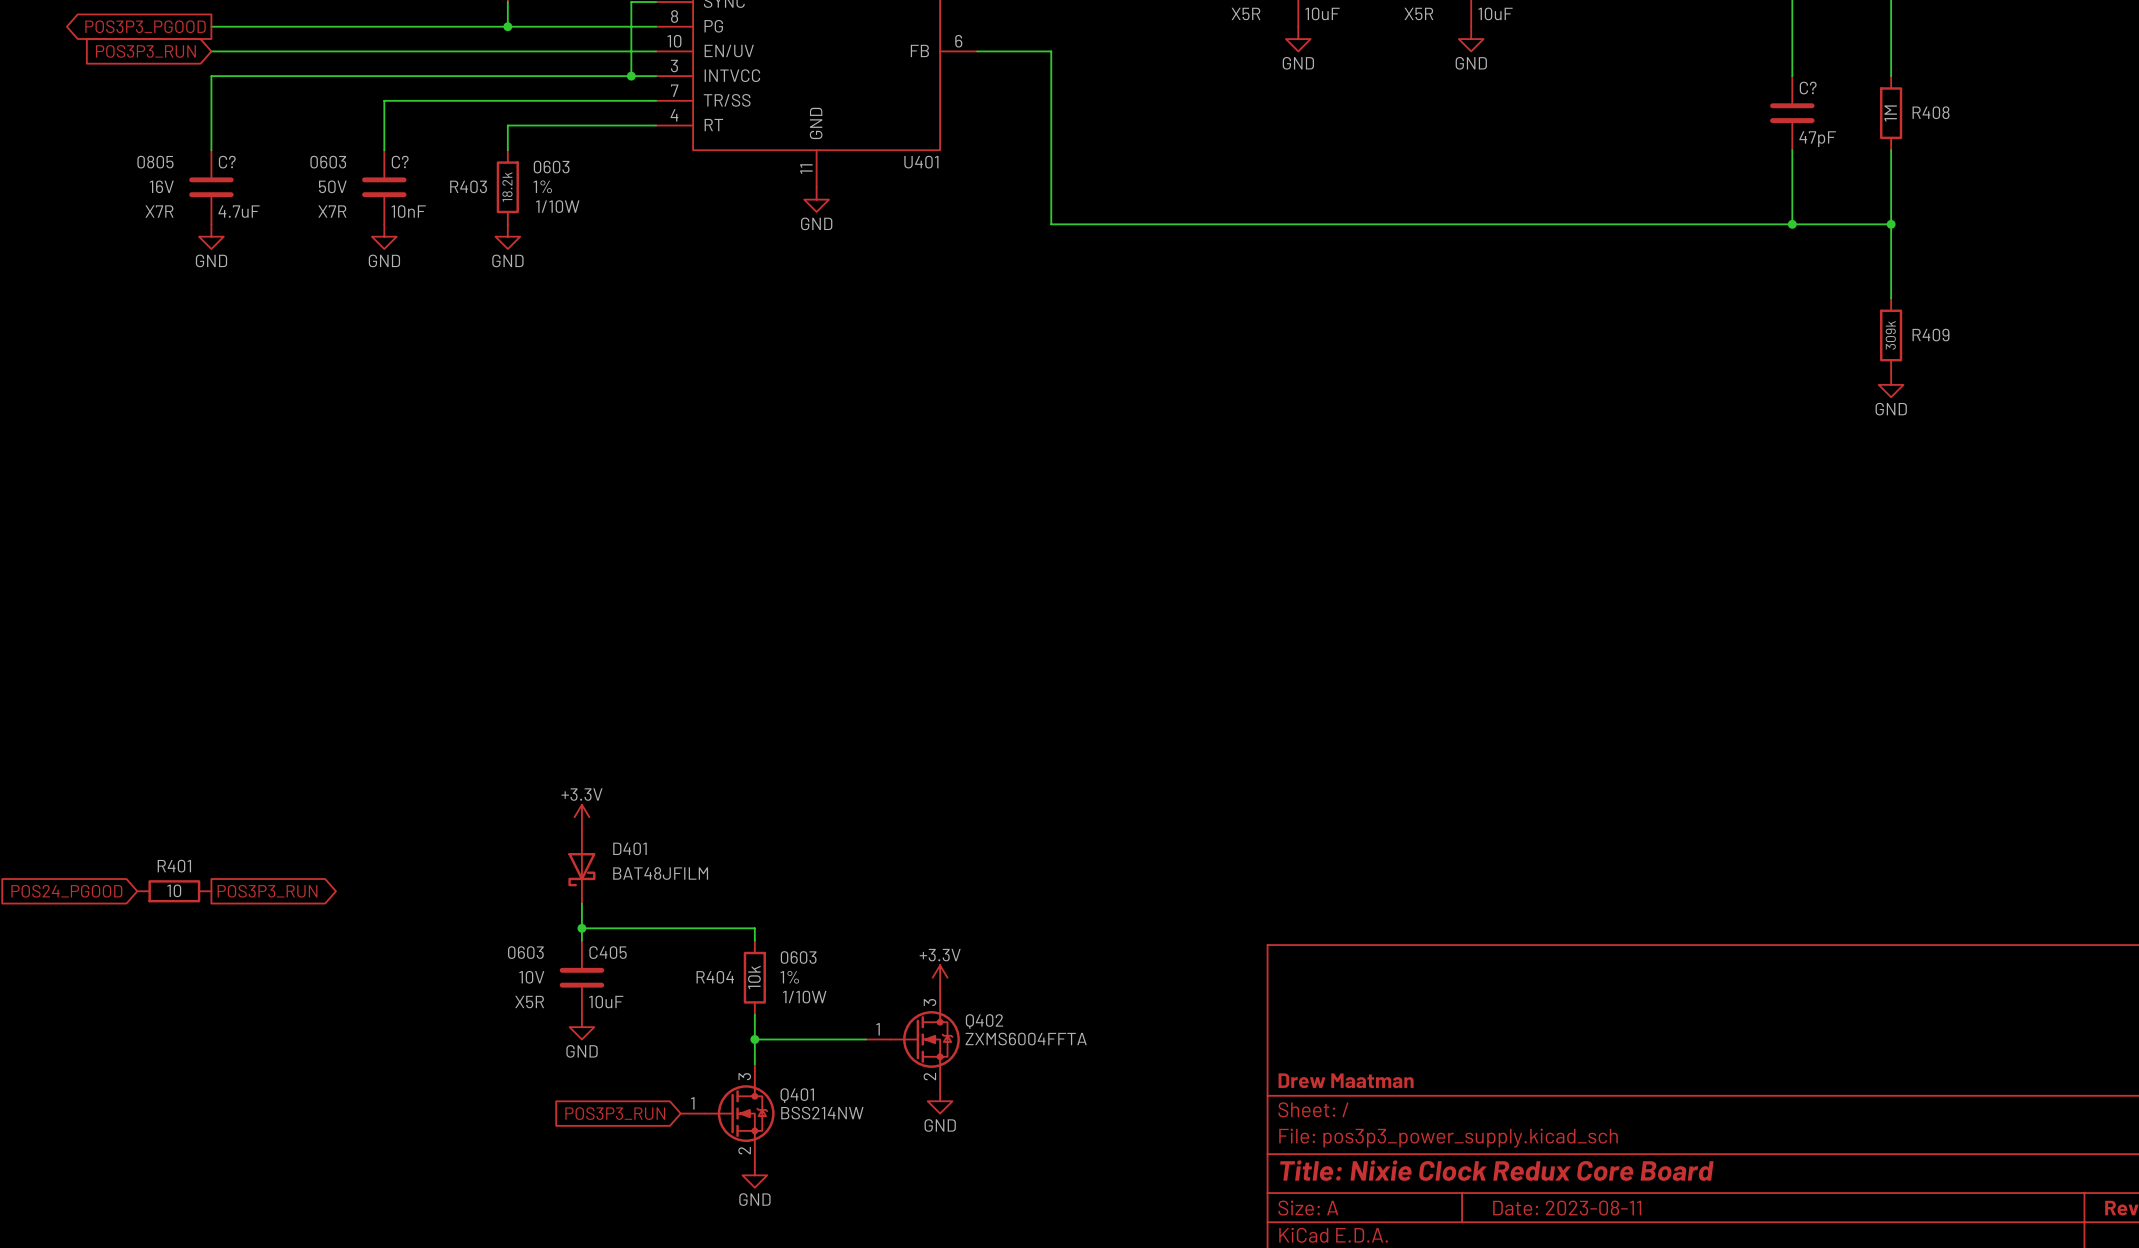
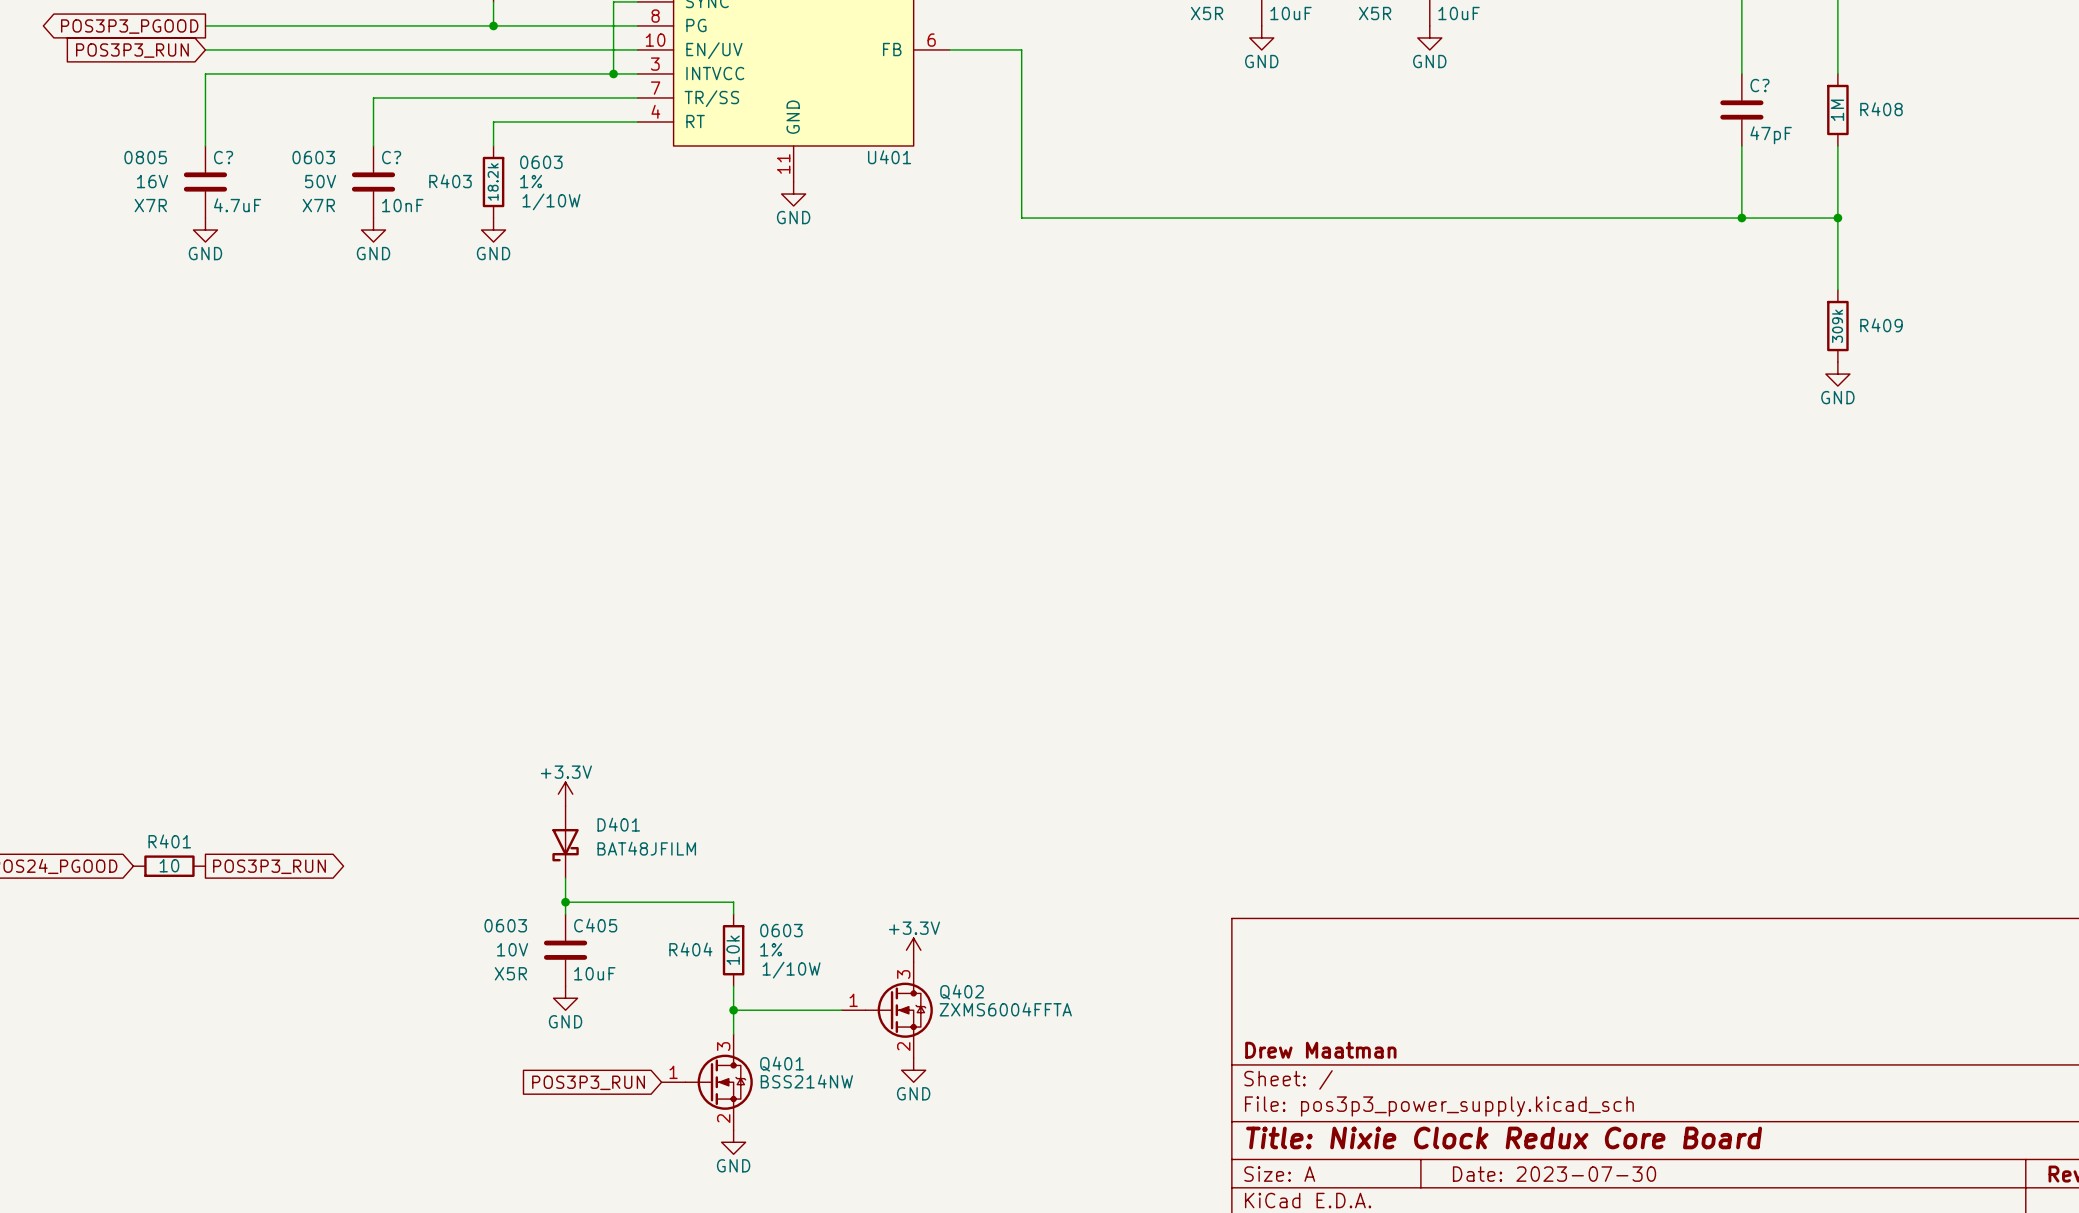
title block: Date: 2023-08-11 (1567, 1208) -> Date: 2023-07-30 (1554, 1174)

